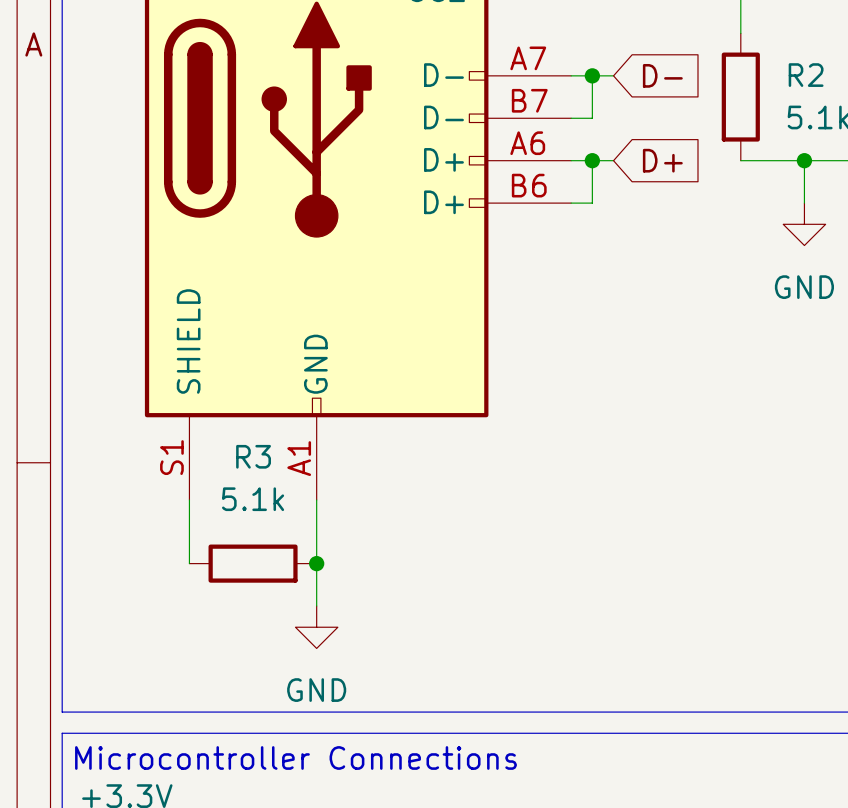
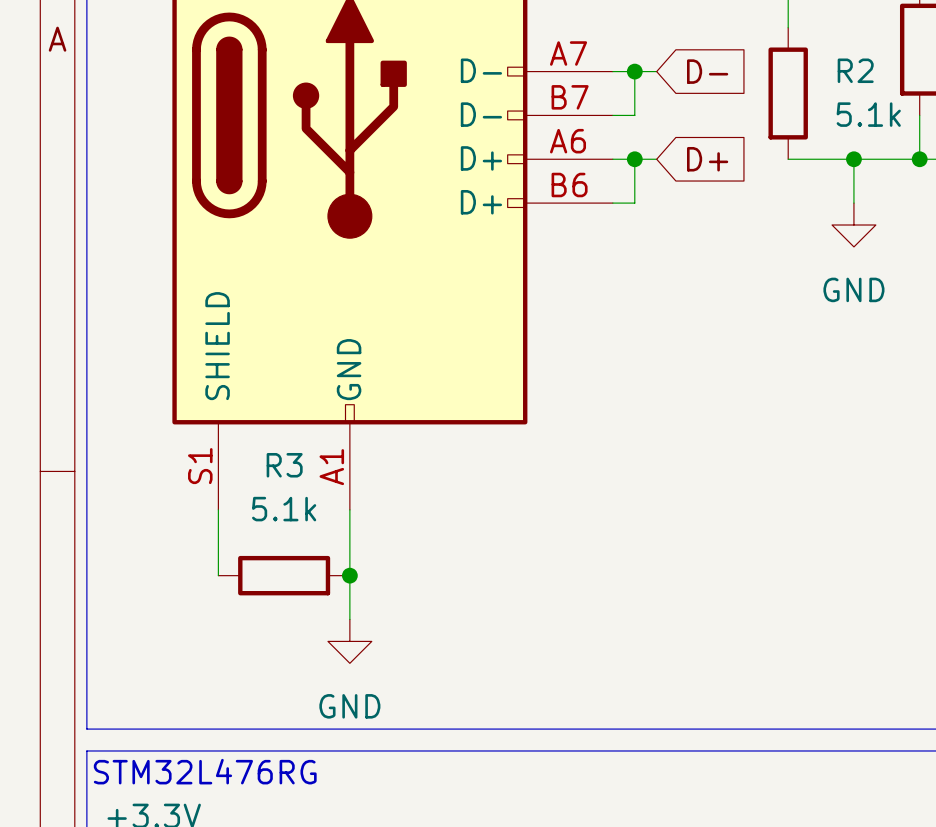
text: none -> STM32L476RG (205, 771)
text: Microcontroller Connections (295, 757) -> none

